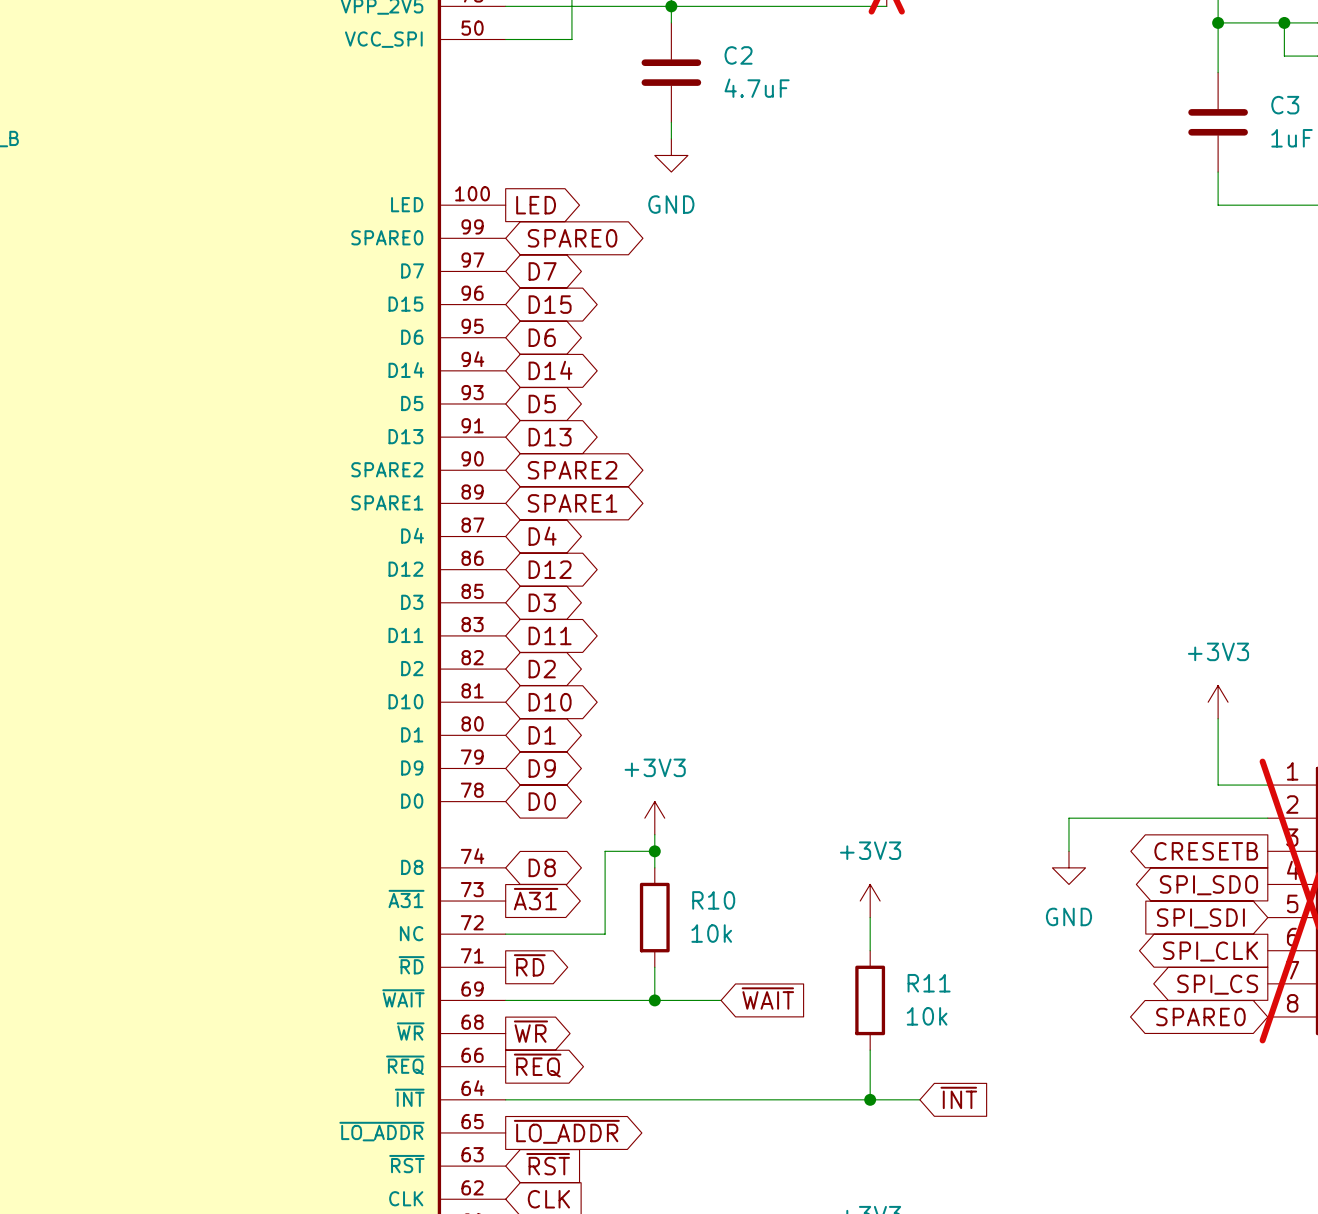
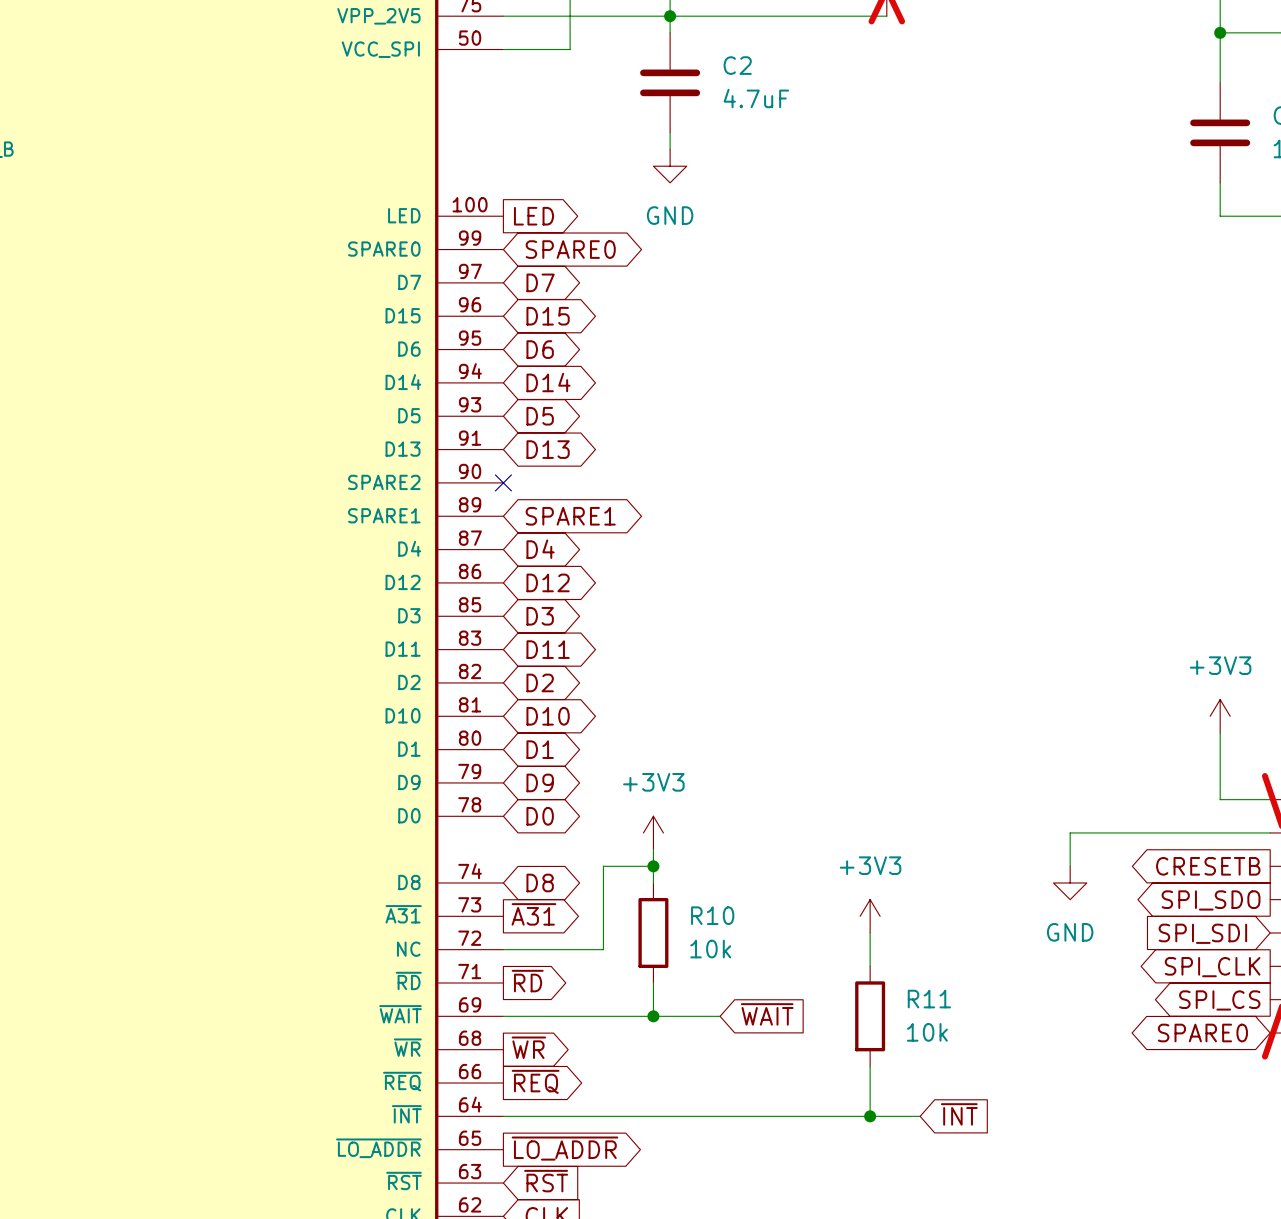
no-connect mark: none -> (503, 482)
global label: SPARE2 (572, 470) -> none

